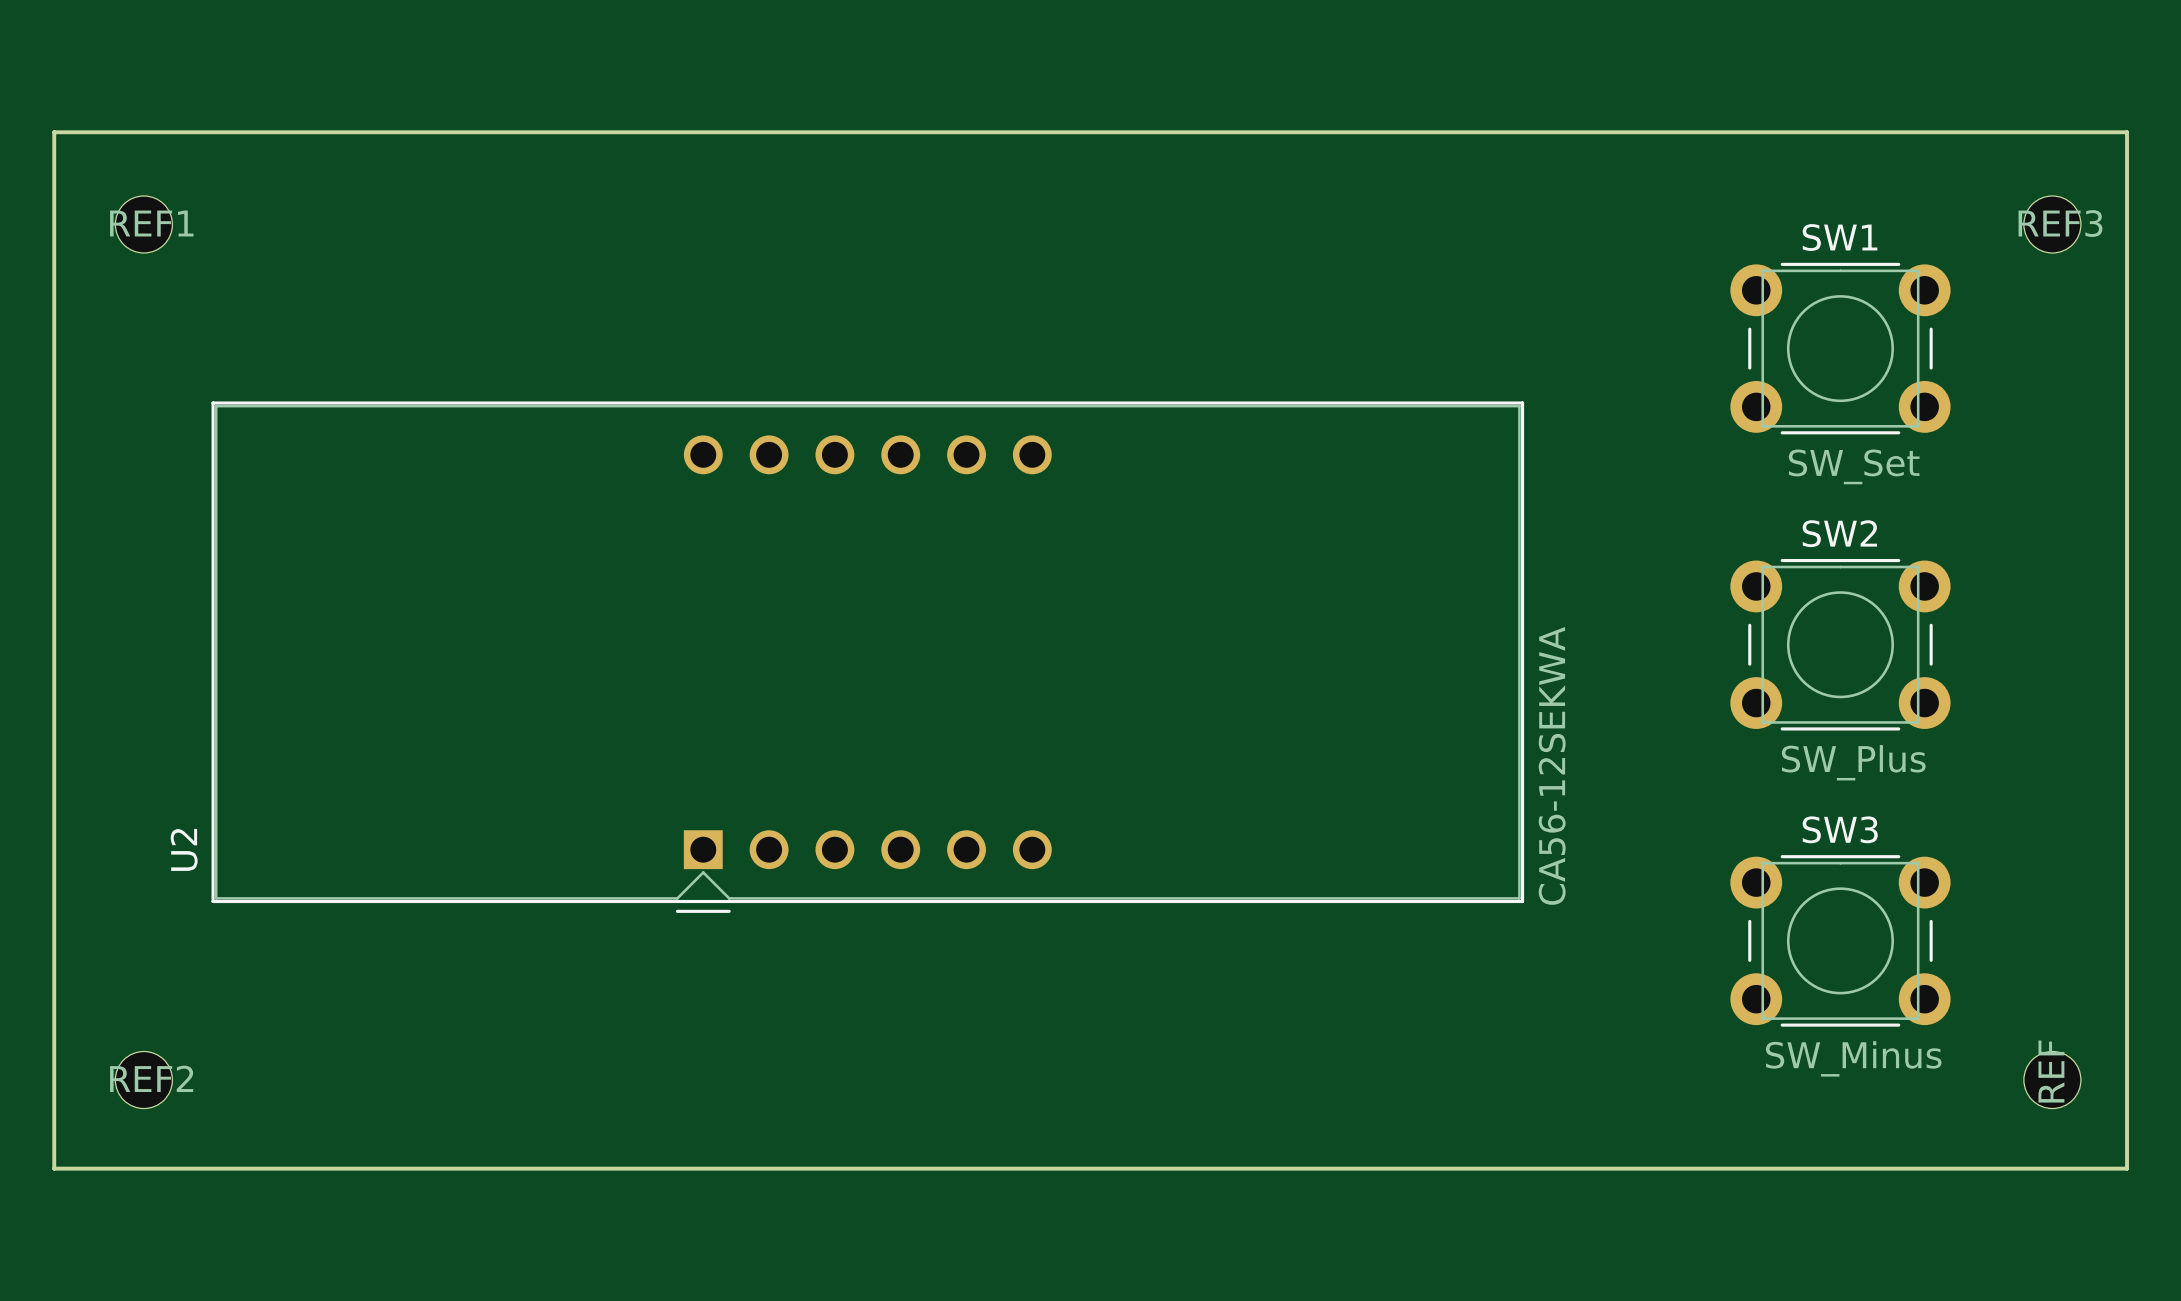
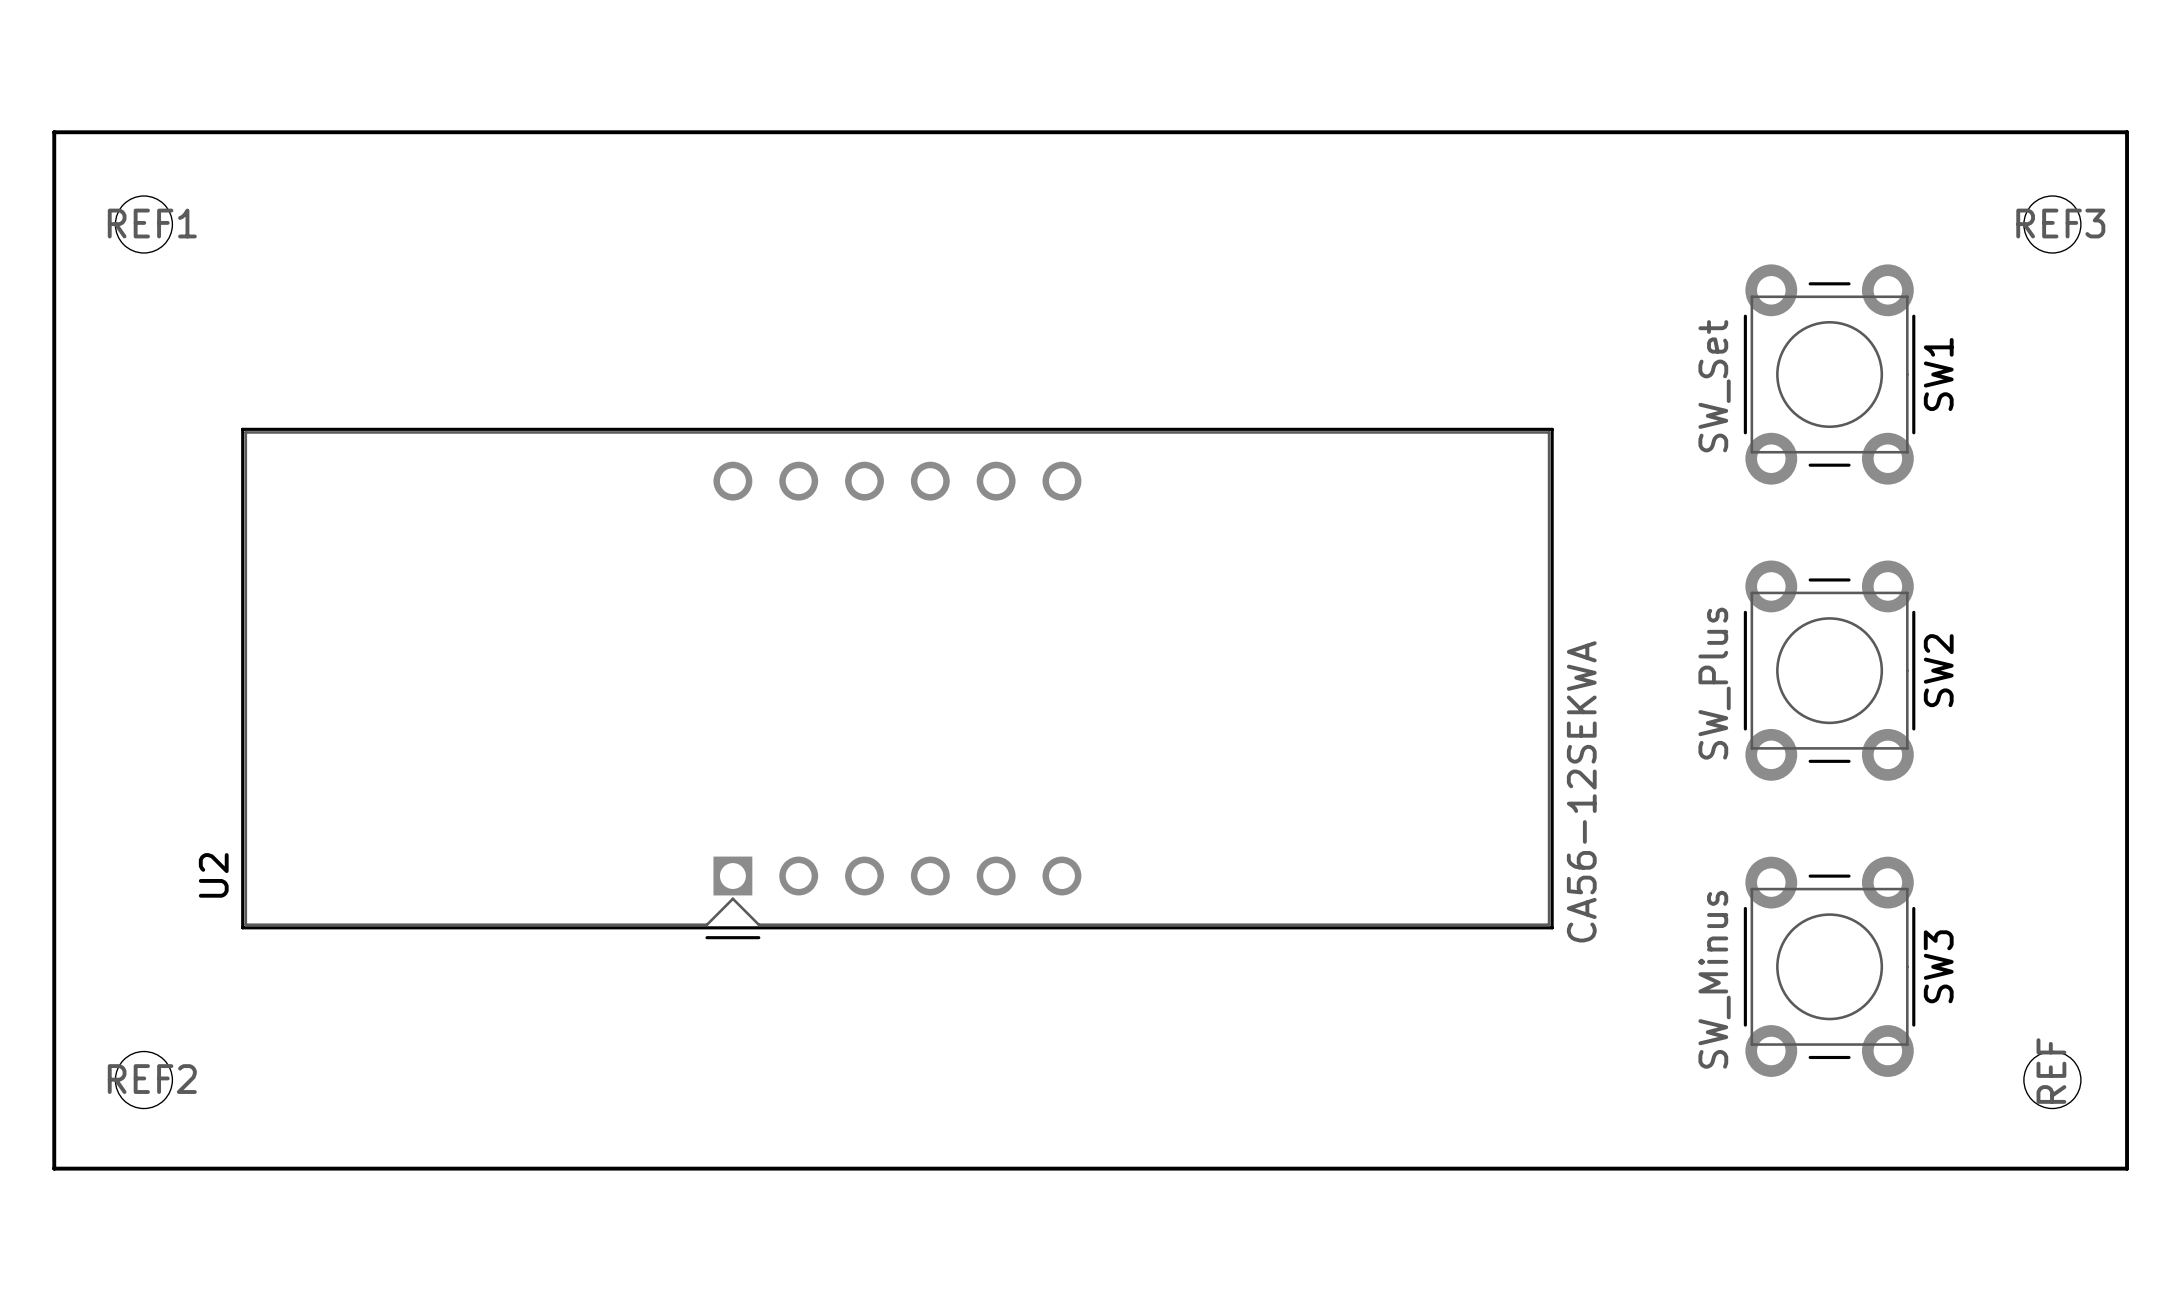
SW1 rotation: 0° (1840, 348) -> 90° clockwise (1829, 374)
SW2 rotation: 0° (1840, 644) -> 90° clockwise (1829, 670)
U2 position: (867, 657) -> (897, 683)
SW3 rotation: 0° (1840, 940) -> 90° clockwise (1829, 966)

